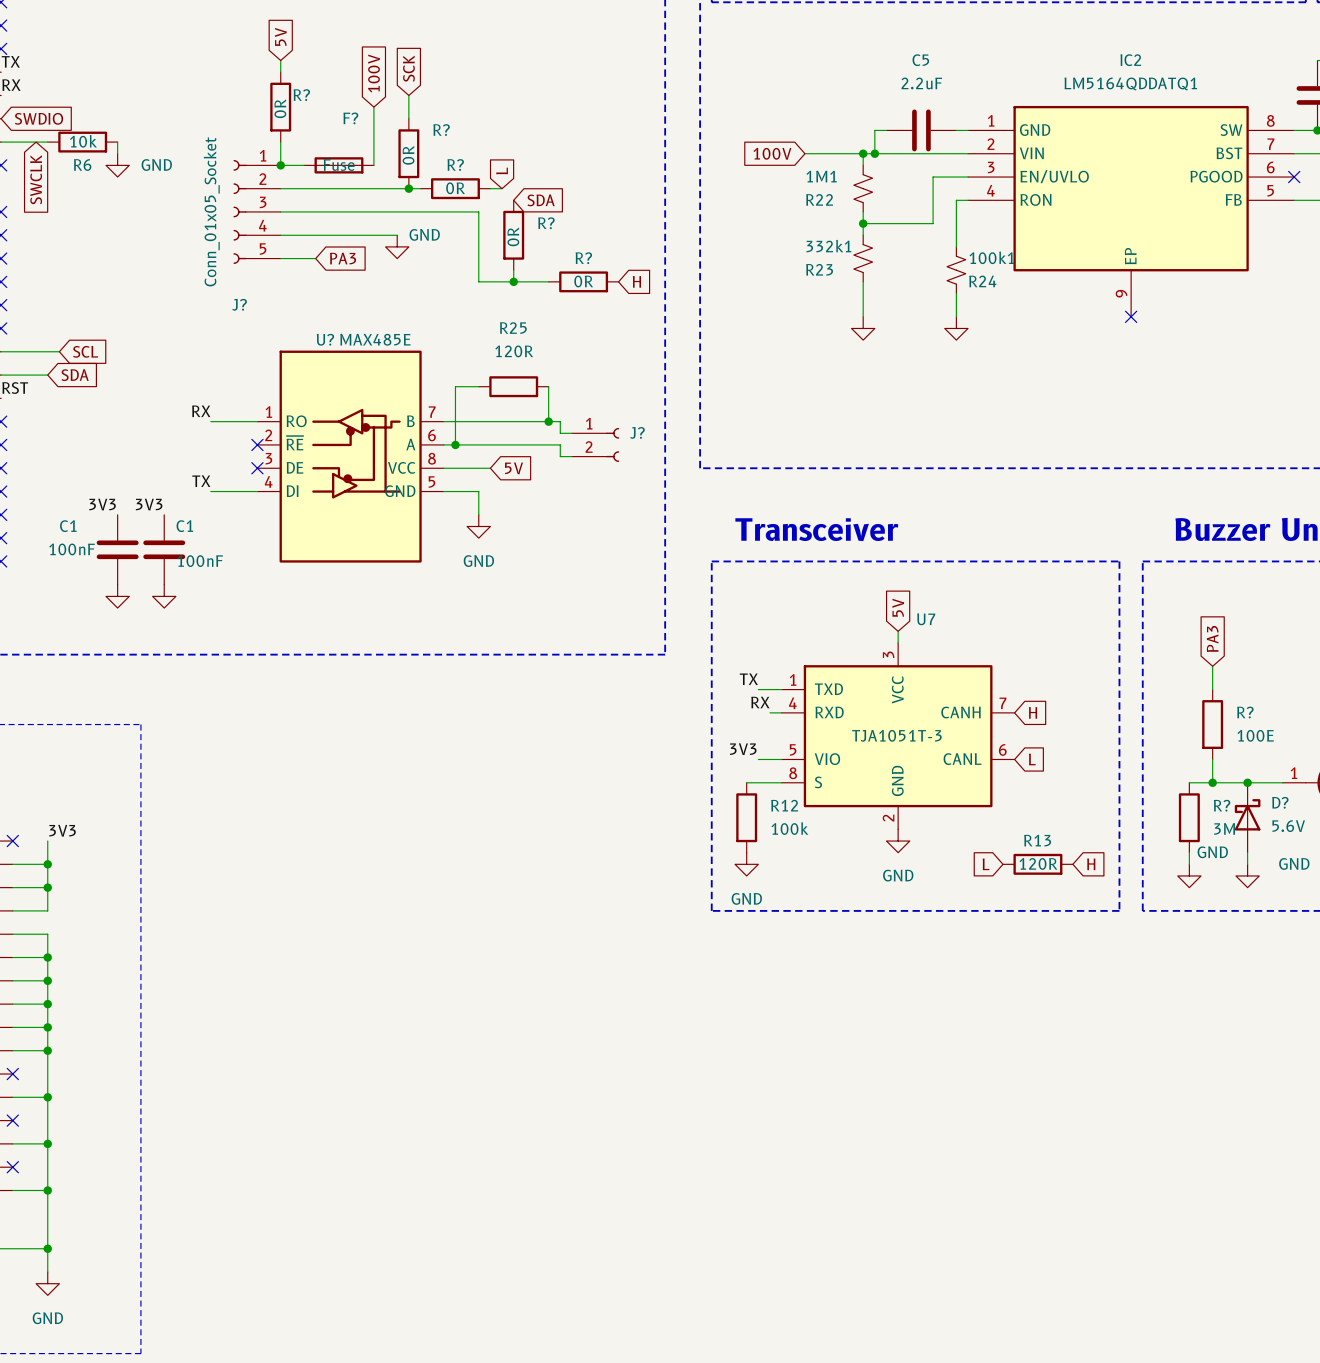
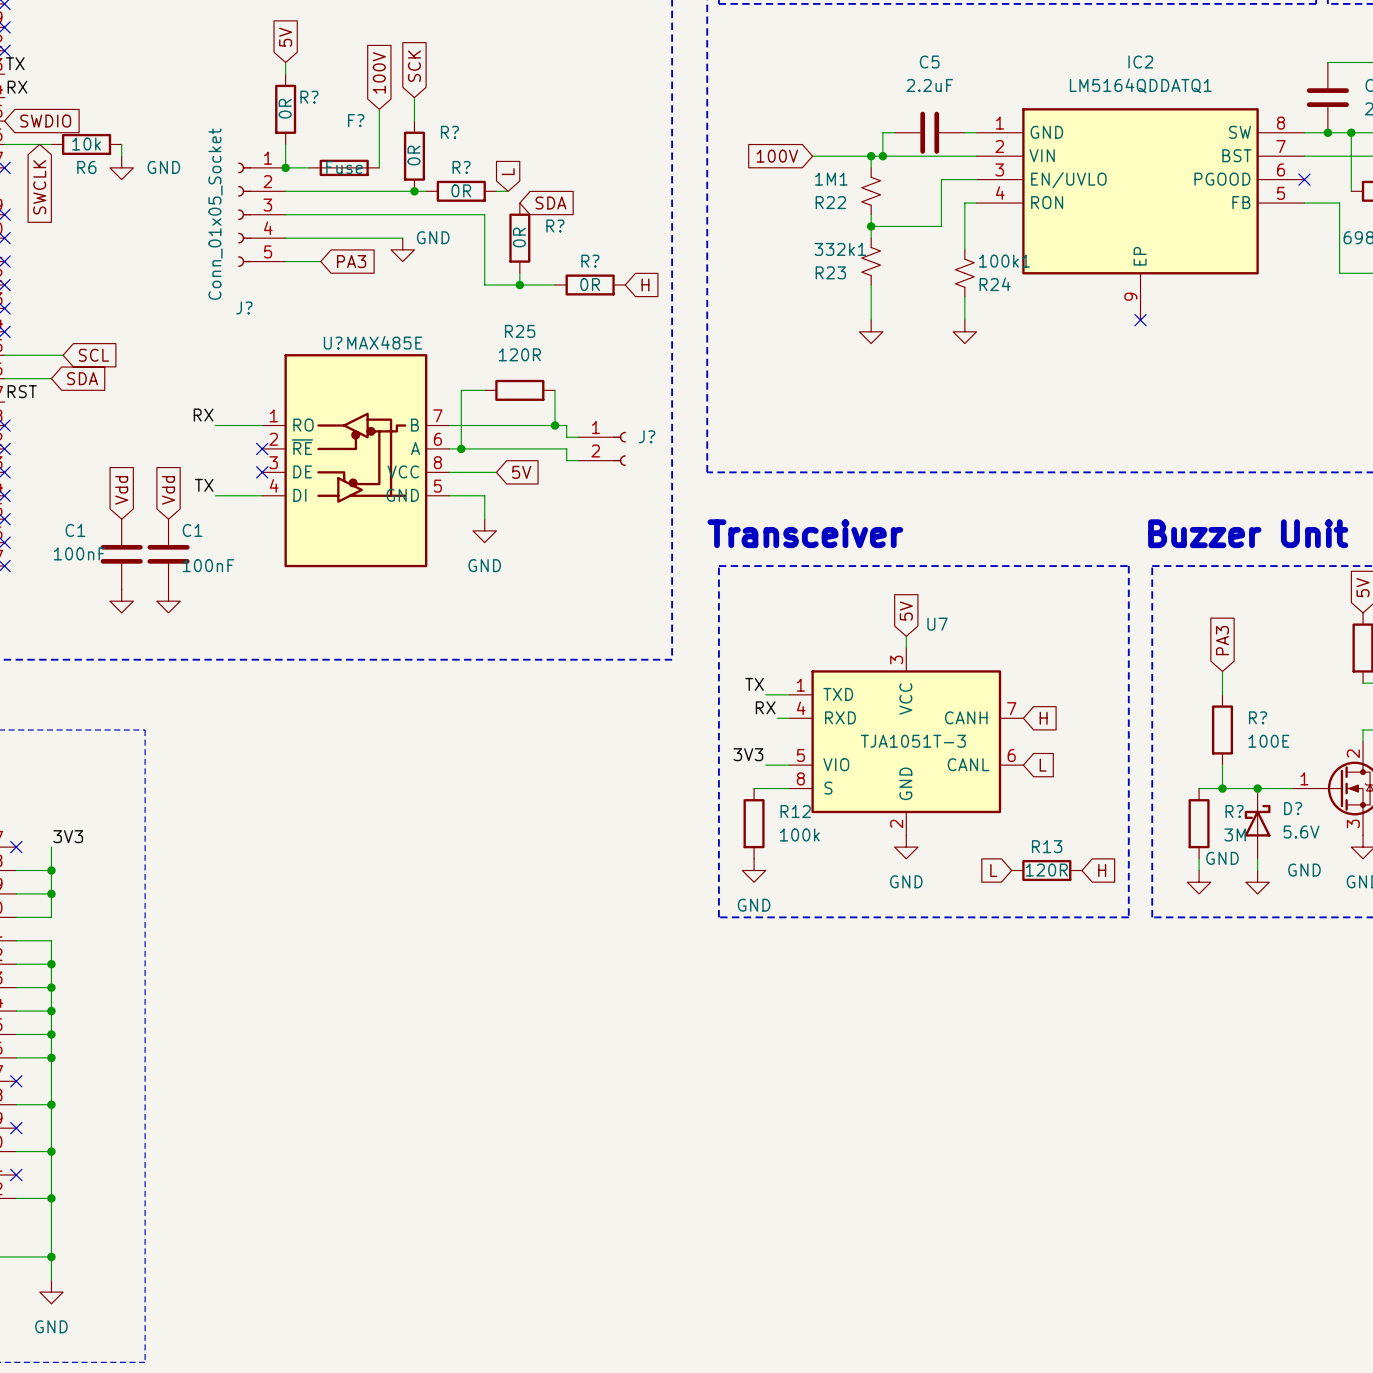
global label: none -> Vdd (121, 490)
global label: none -> Vdd (168, 490)
label: 3V3 (102, 504) -> none
label: 3V3 (149, 504) -> none

